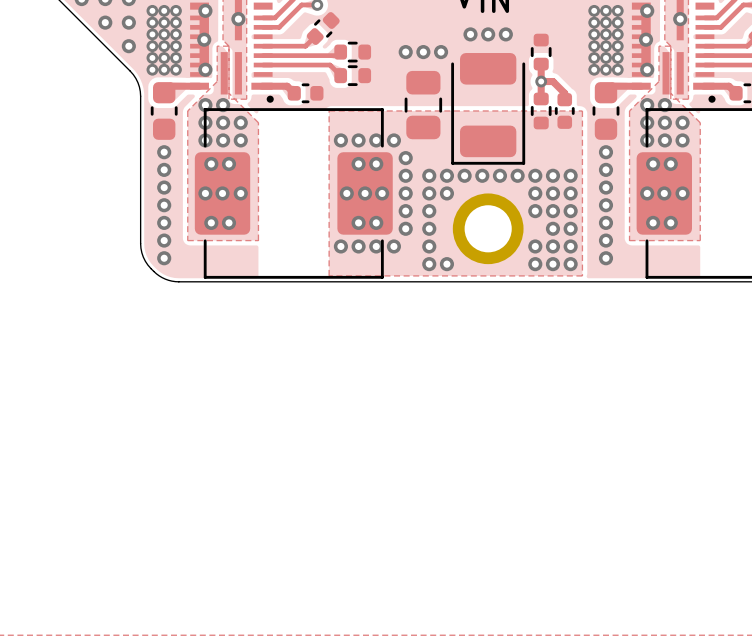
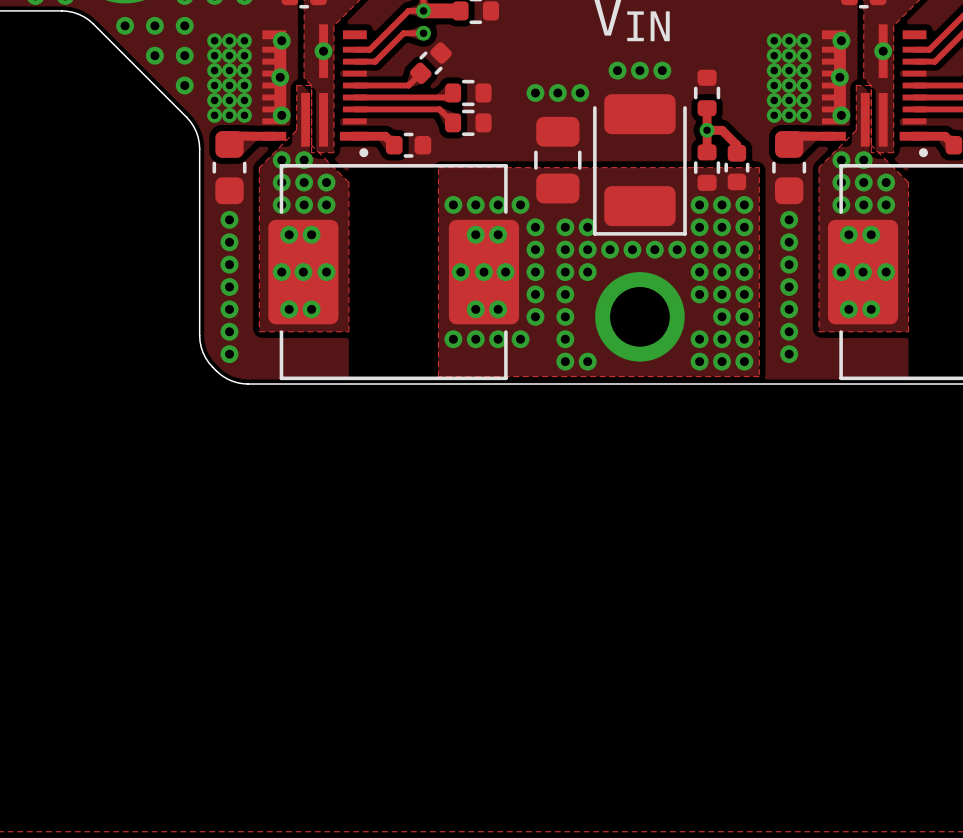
via: none -> (699, 204)
via: none -> (722, 204)
via: none -> (744, 204)
via: none -> (565, 227)
via: none -> (587, 227)
via: none -> (699, 227)
via: none -> (722, 227)
via: none -> (744, 227)

